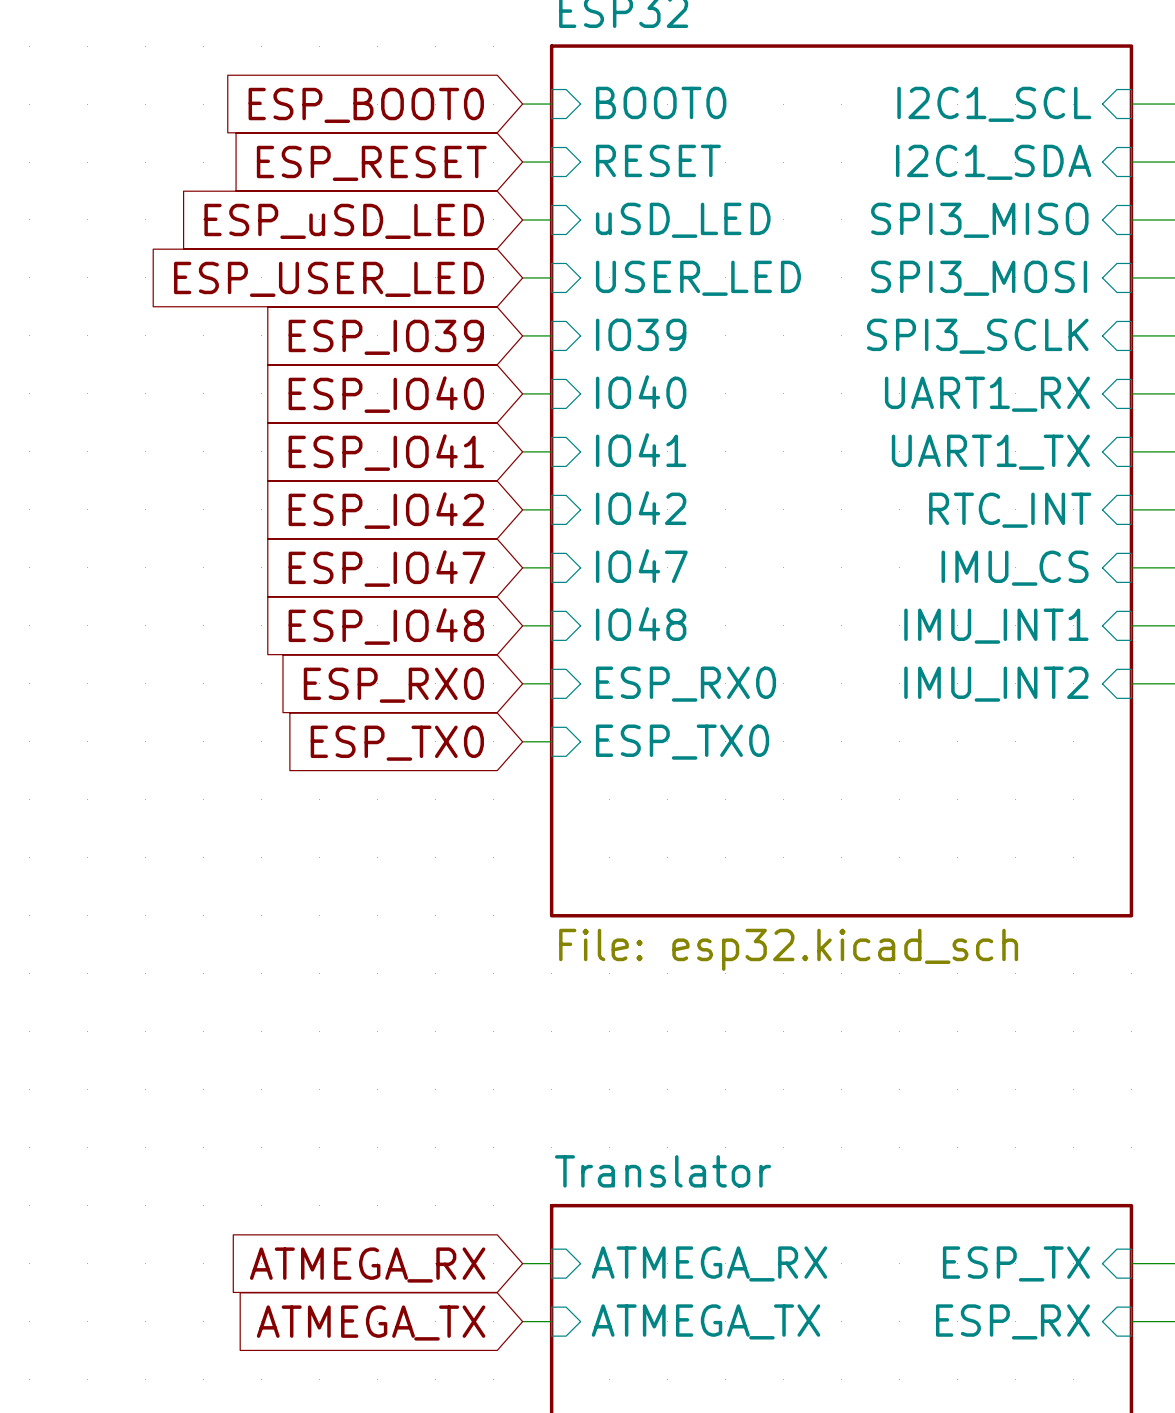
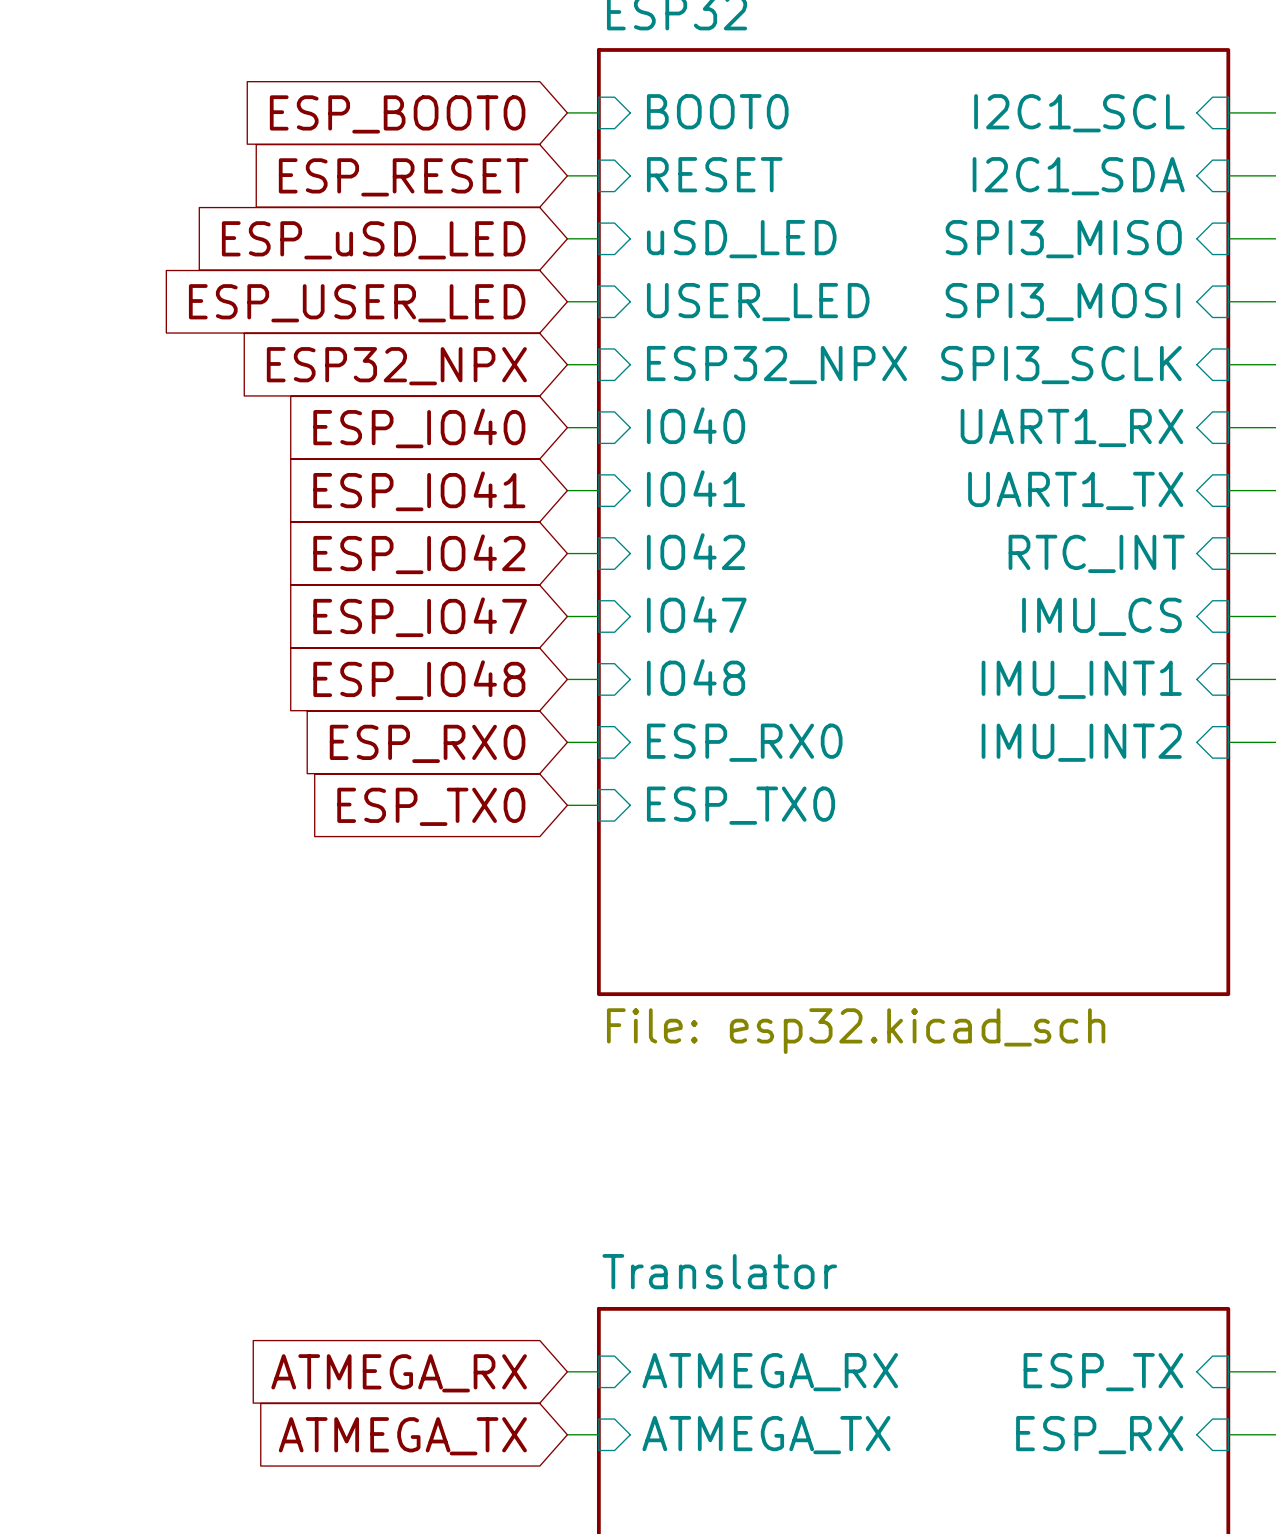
sheet pin: IO39 (641, 334) -> ESP32_NPX (776, 365)
global label: ESP_IO39 (386, 337) -> ESP32_NPX (396, 366)

